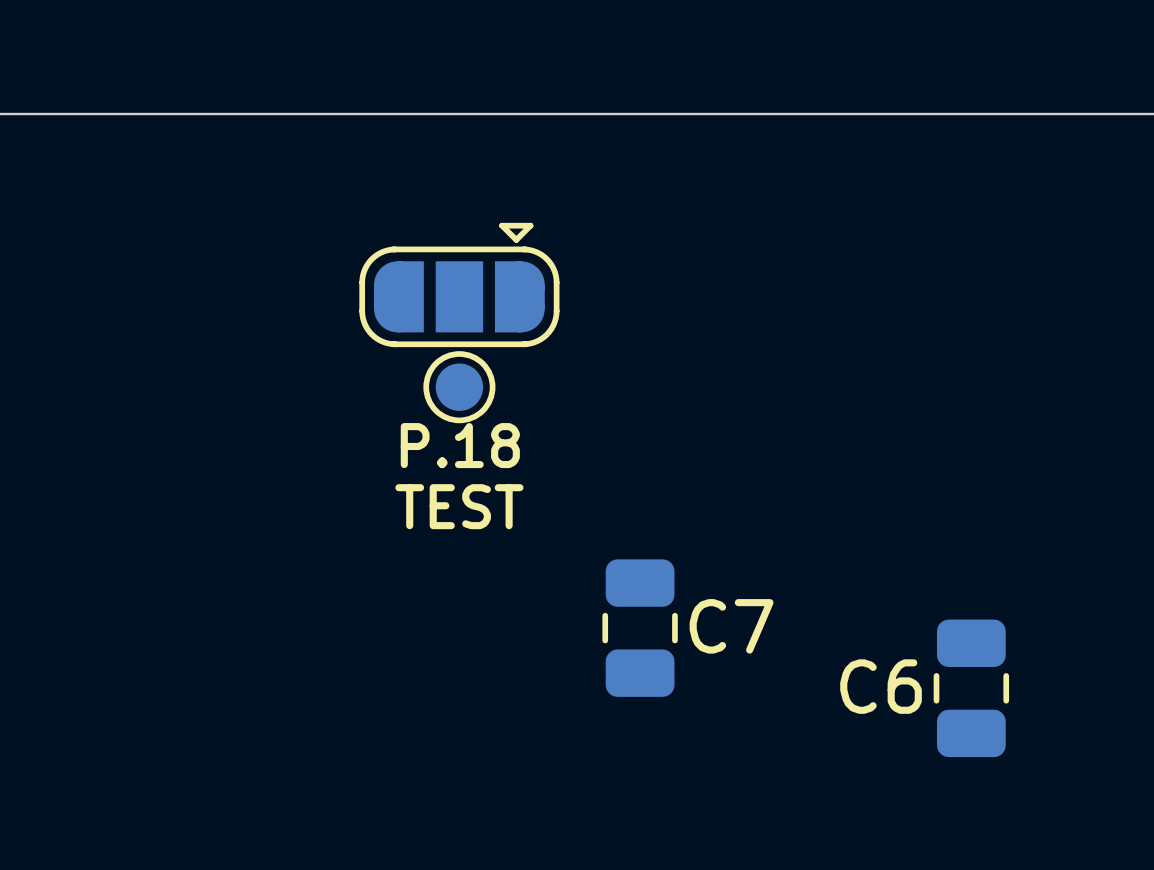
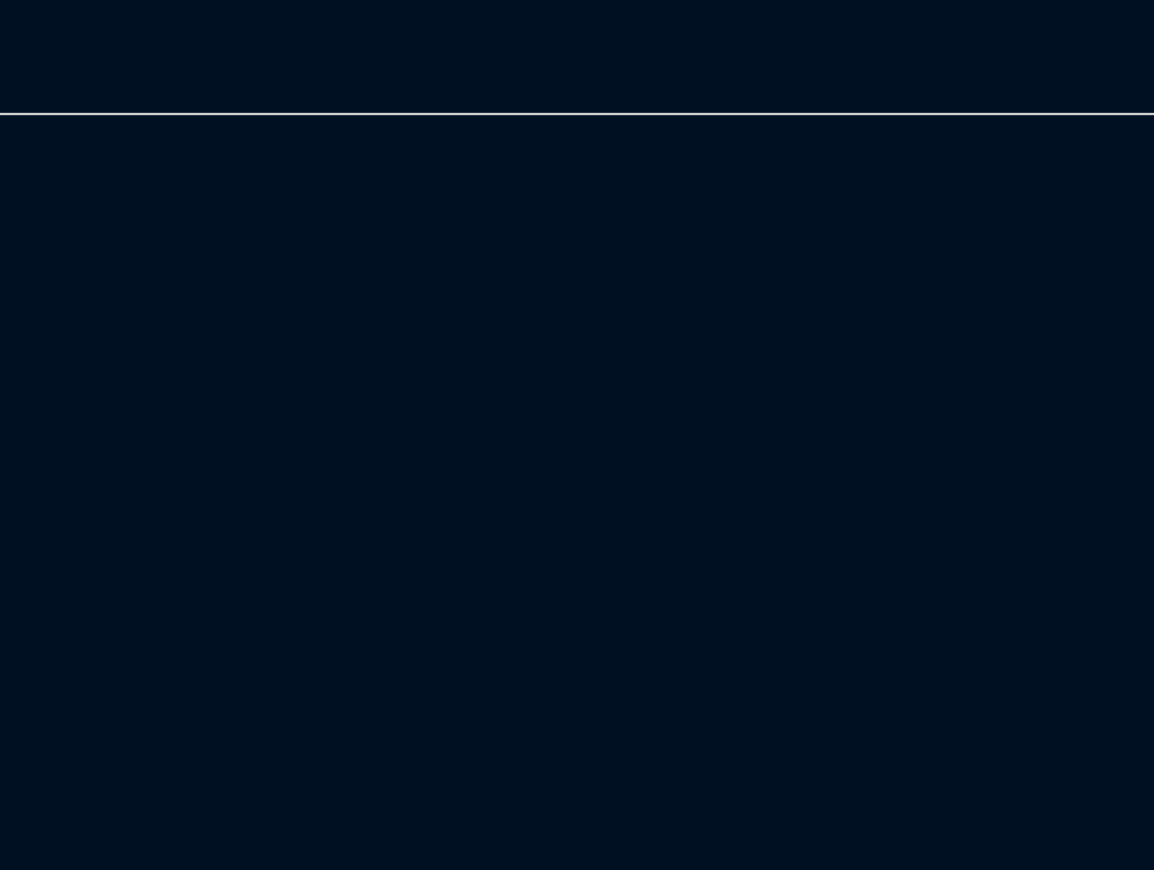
part: (459, 284) -> none
part: (459, 387) -> none
text: P.18 (460, 445) -> none
text: TEST (459, 506) -> none
C7: (640, 628) -> none
C6: (971, 688) -> none

